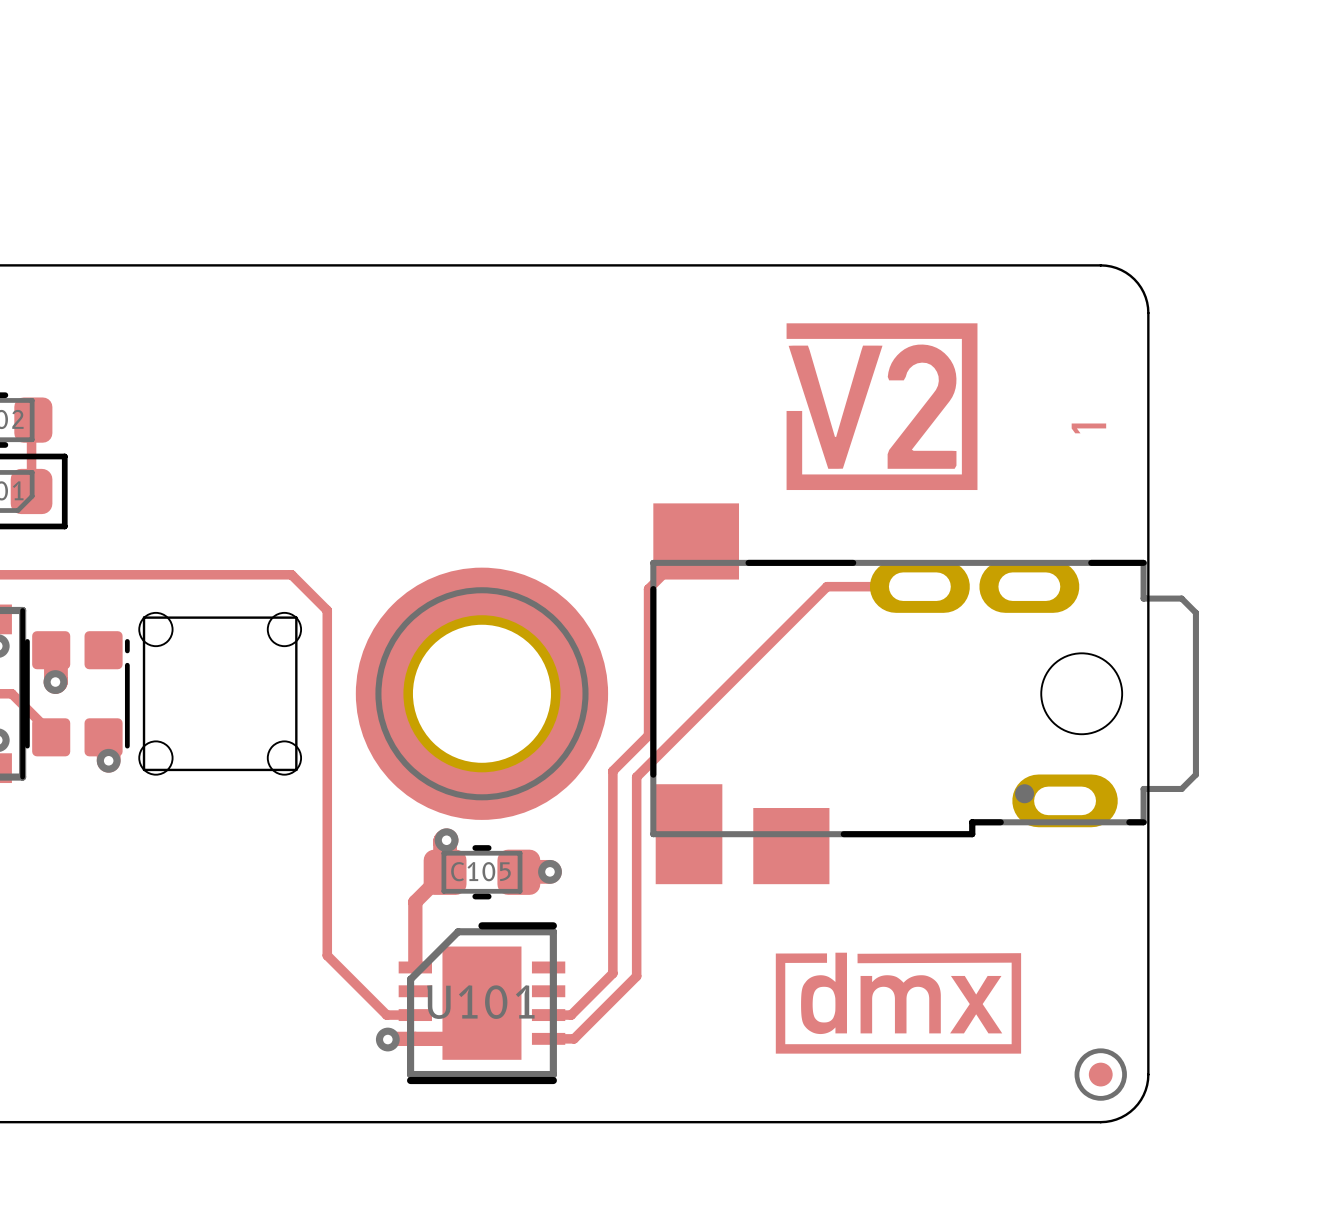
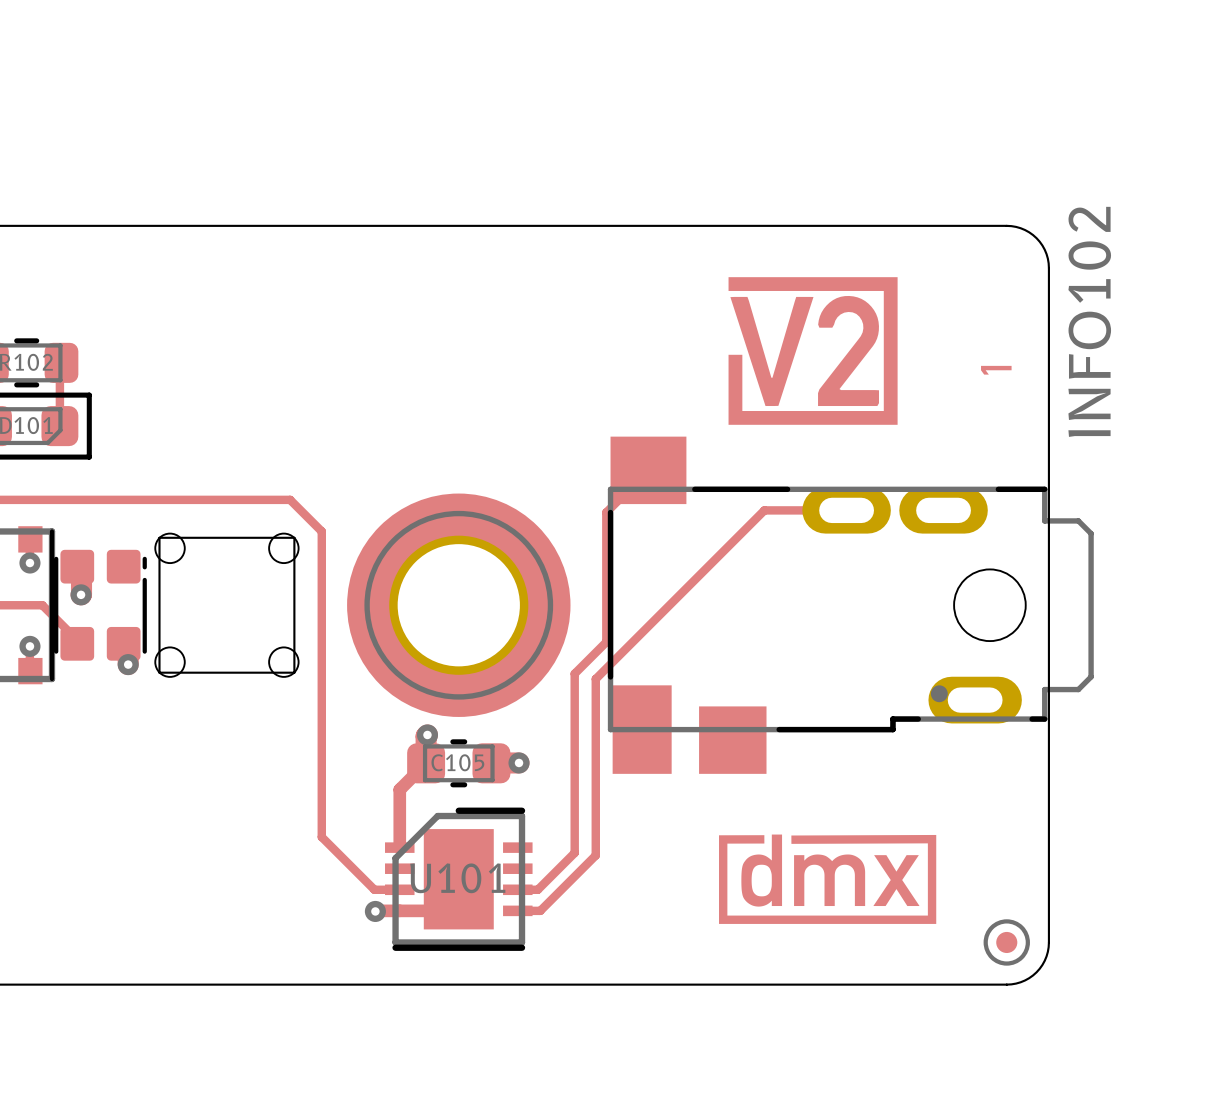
INFO102: none -> (996, 370)

